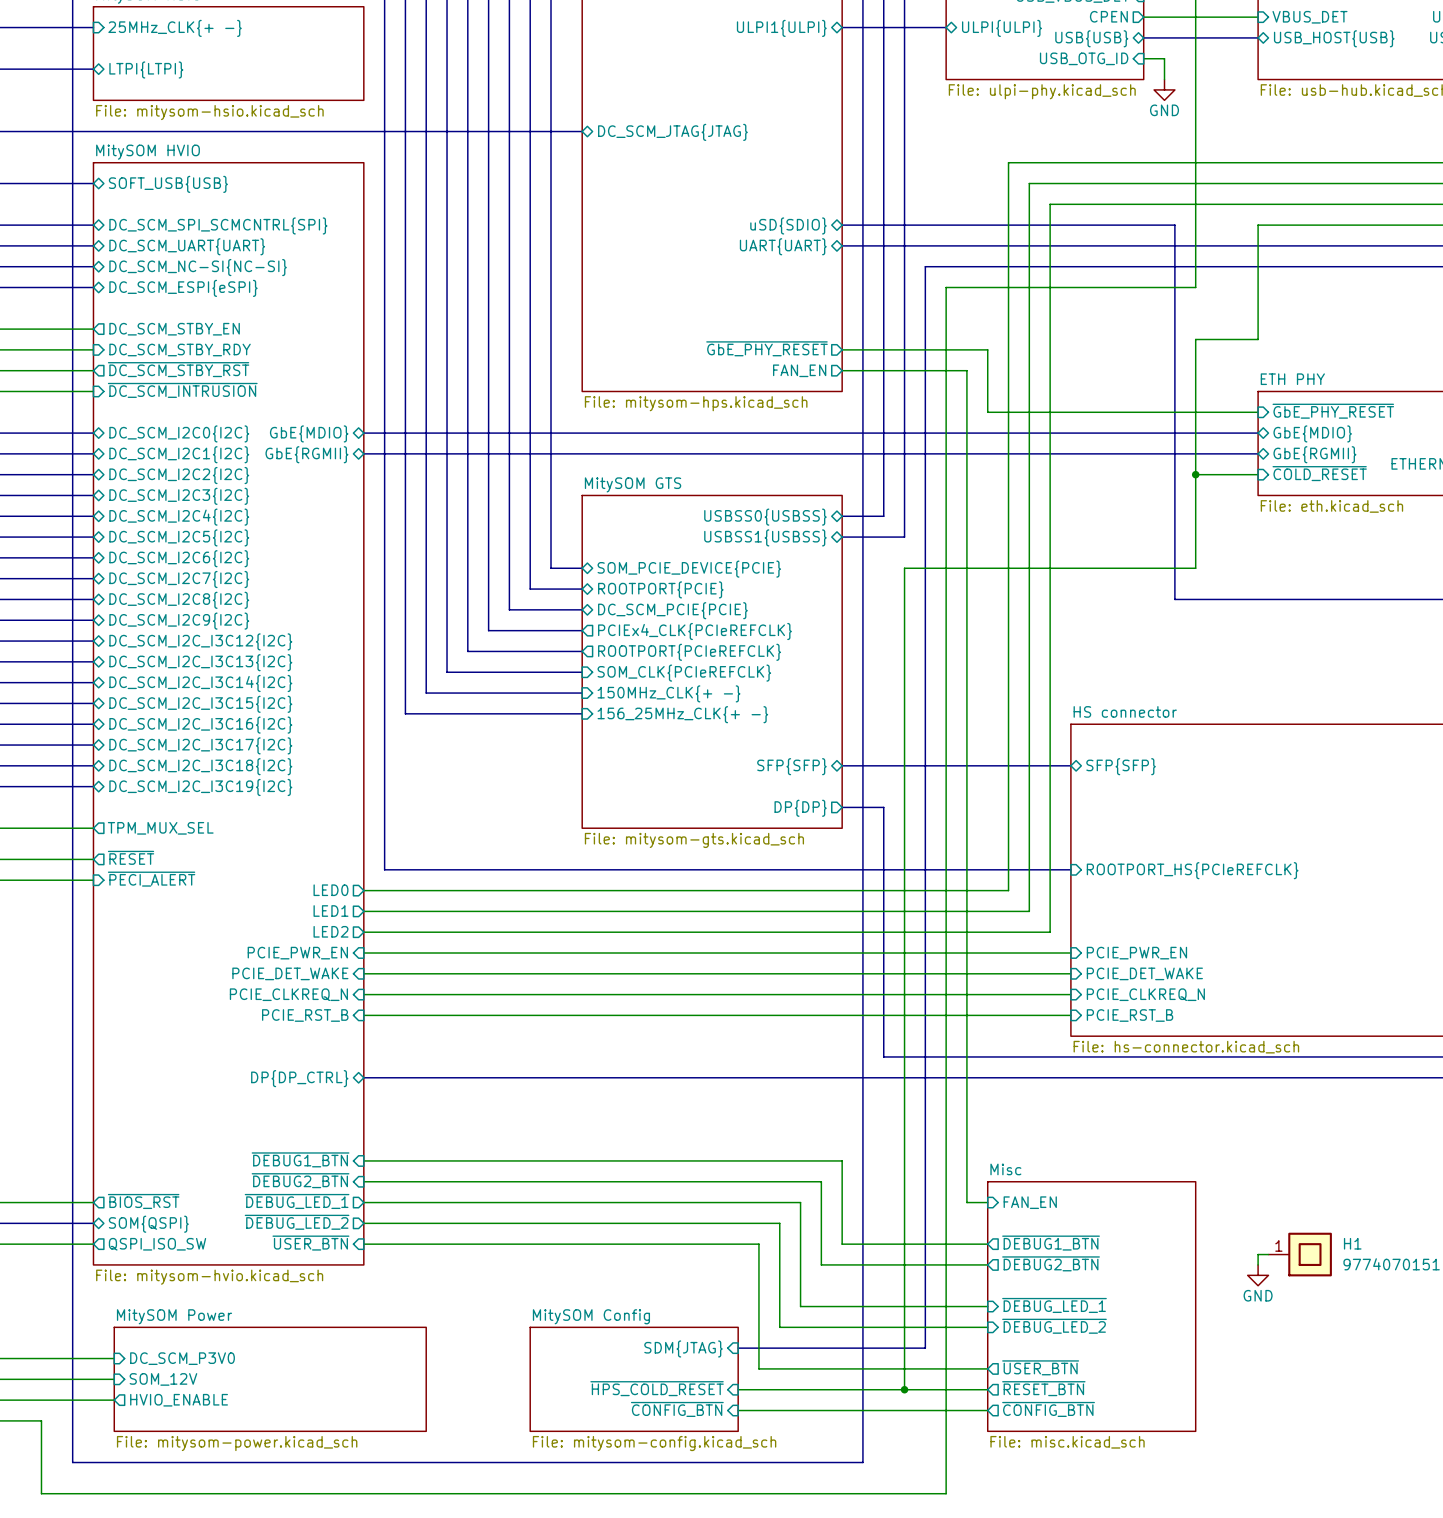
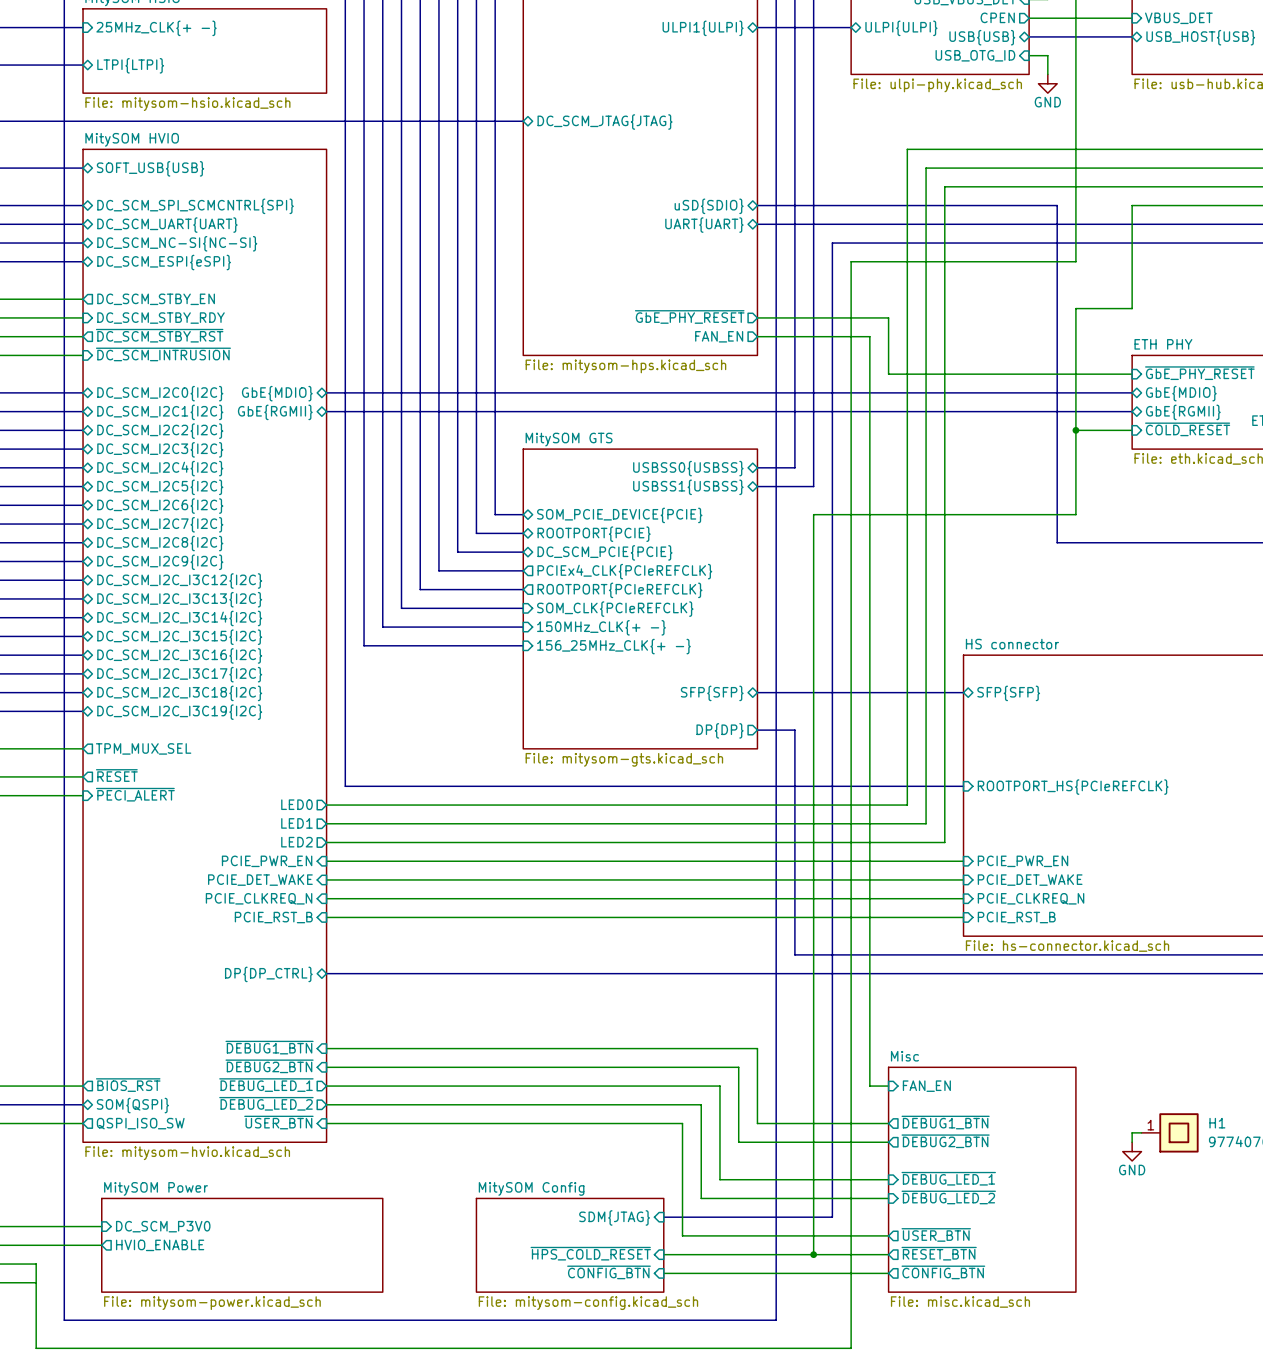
sheet pin shape: input (163, 1379) -> output (160, 1245)
sheet pin: SOM_12V (163, 1379) -> HVIO_ENABLE (160, 1245)
wire: (41, 1400) (114, 1400) -> (36, 1264) (36, 1282)
sheet pin: HVIO_ENABLE (179, 1400) -> none

